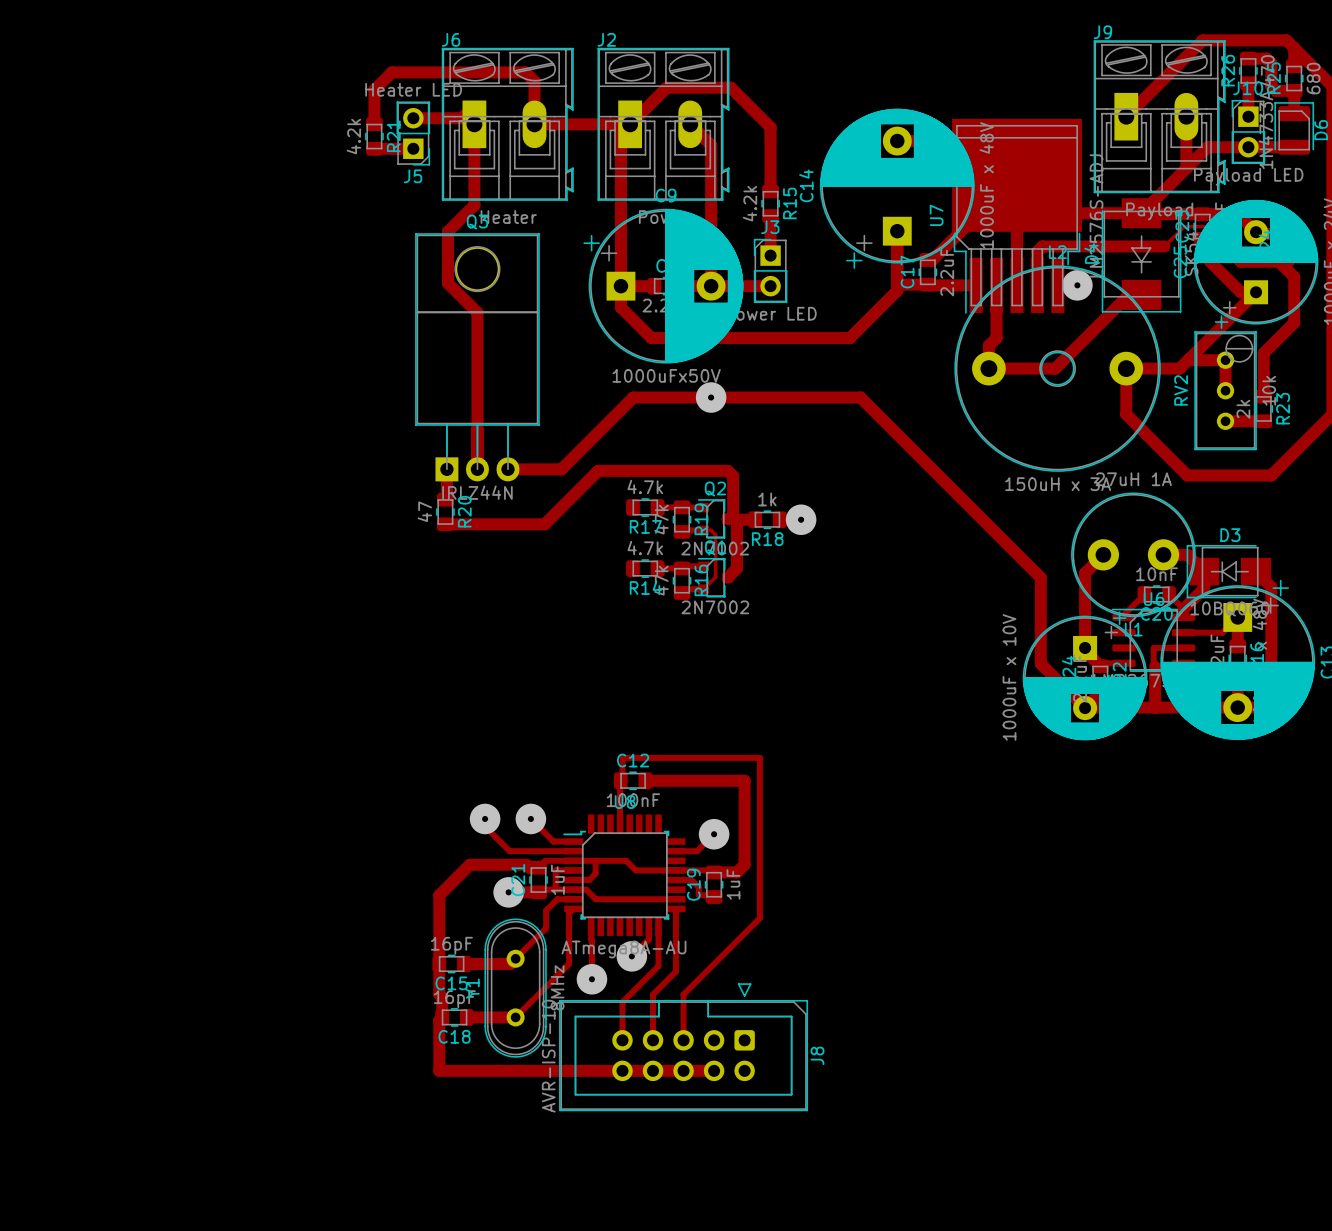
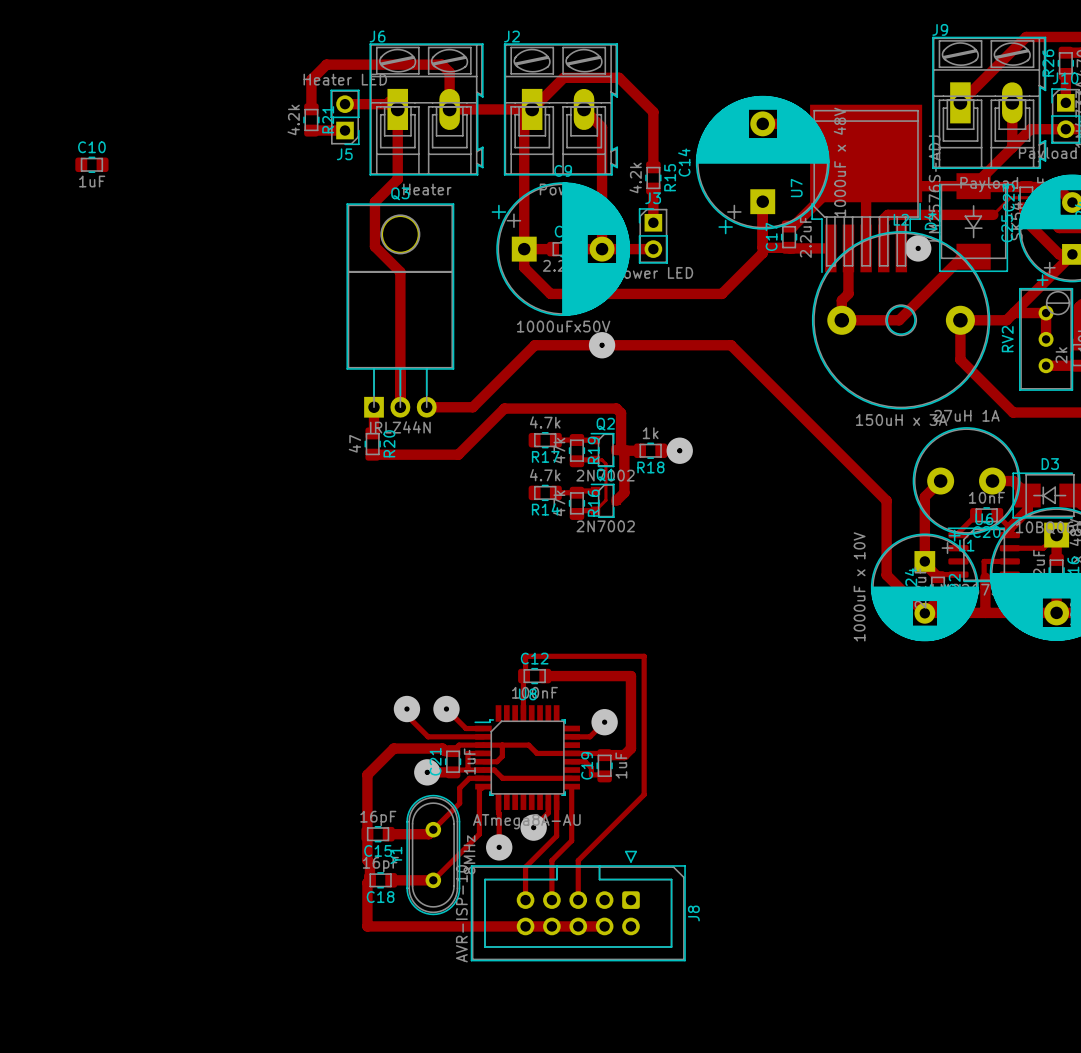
C10: none -> 1uF (91, 164)

